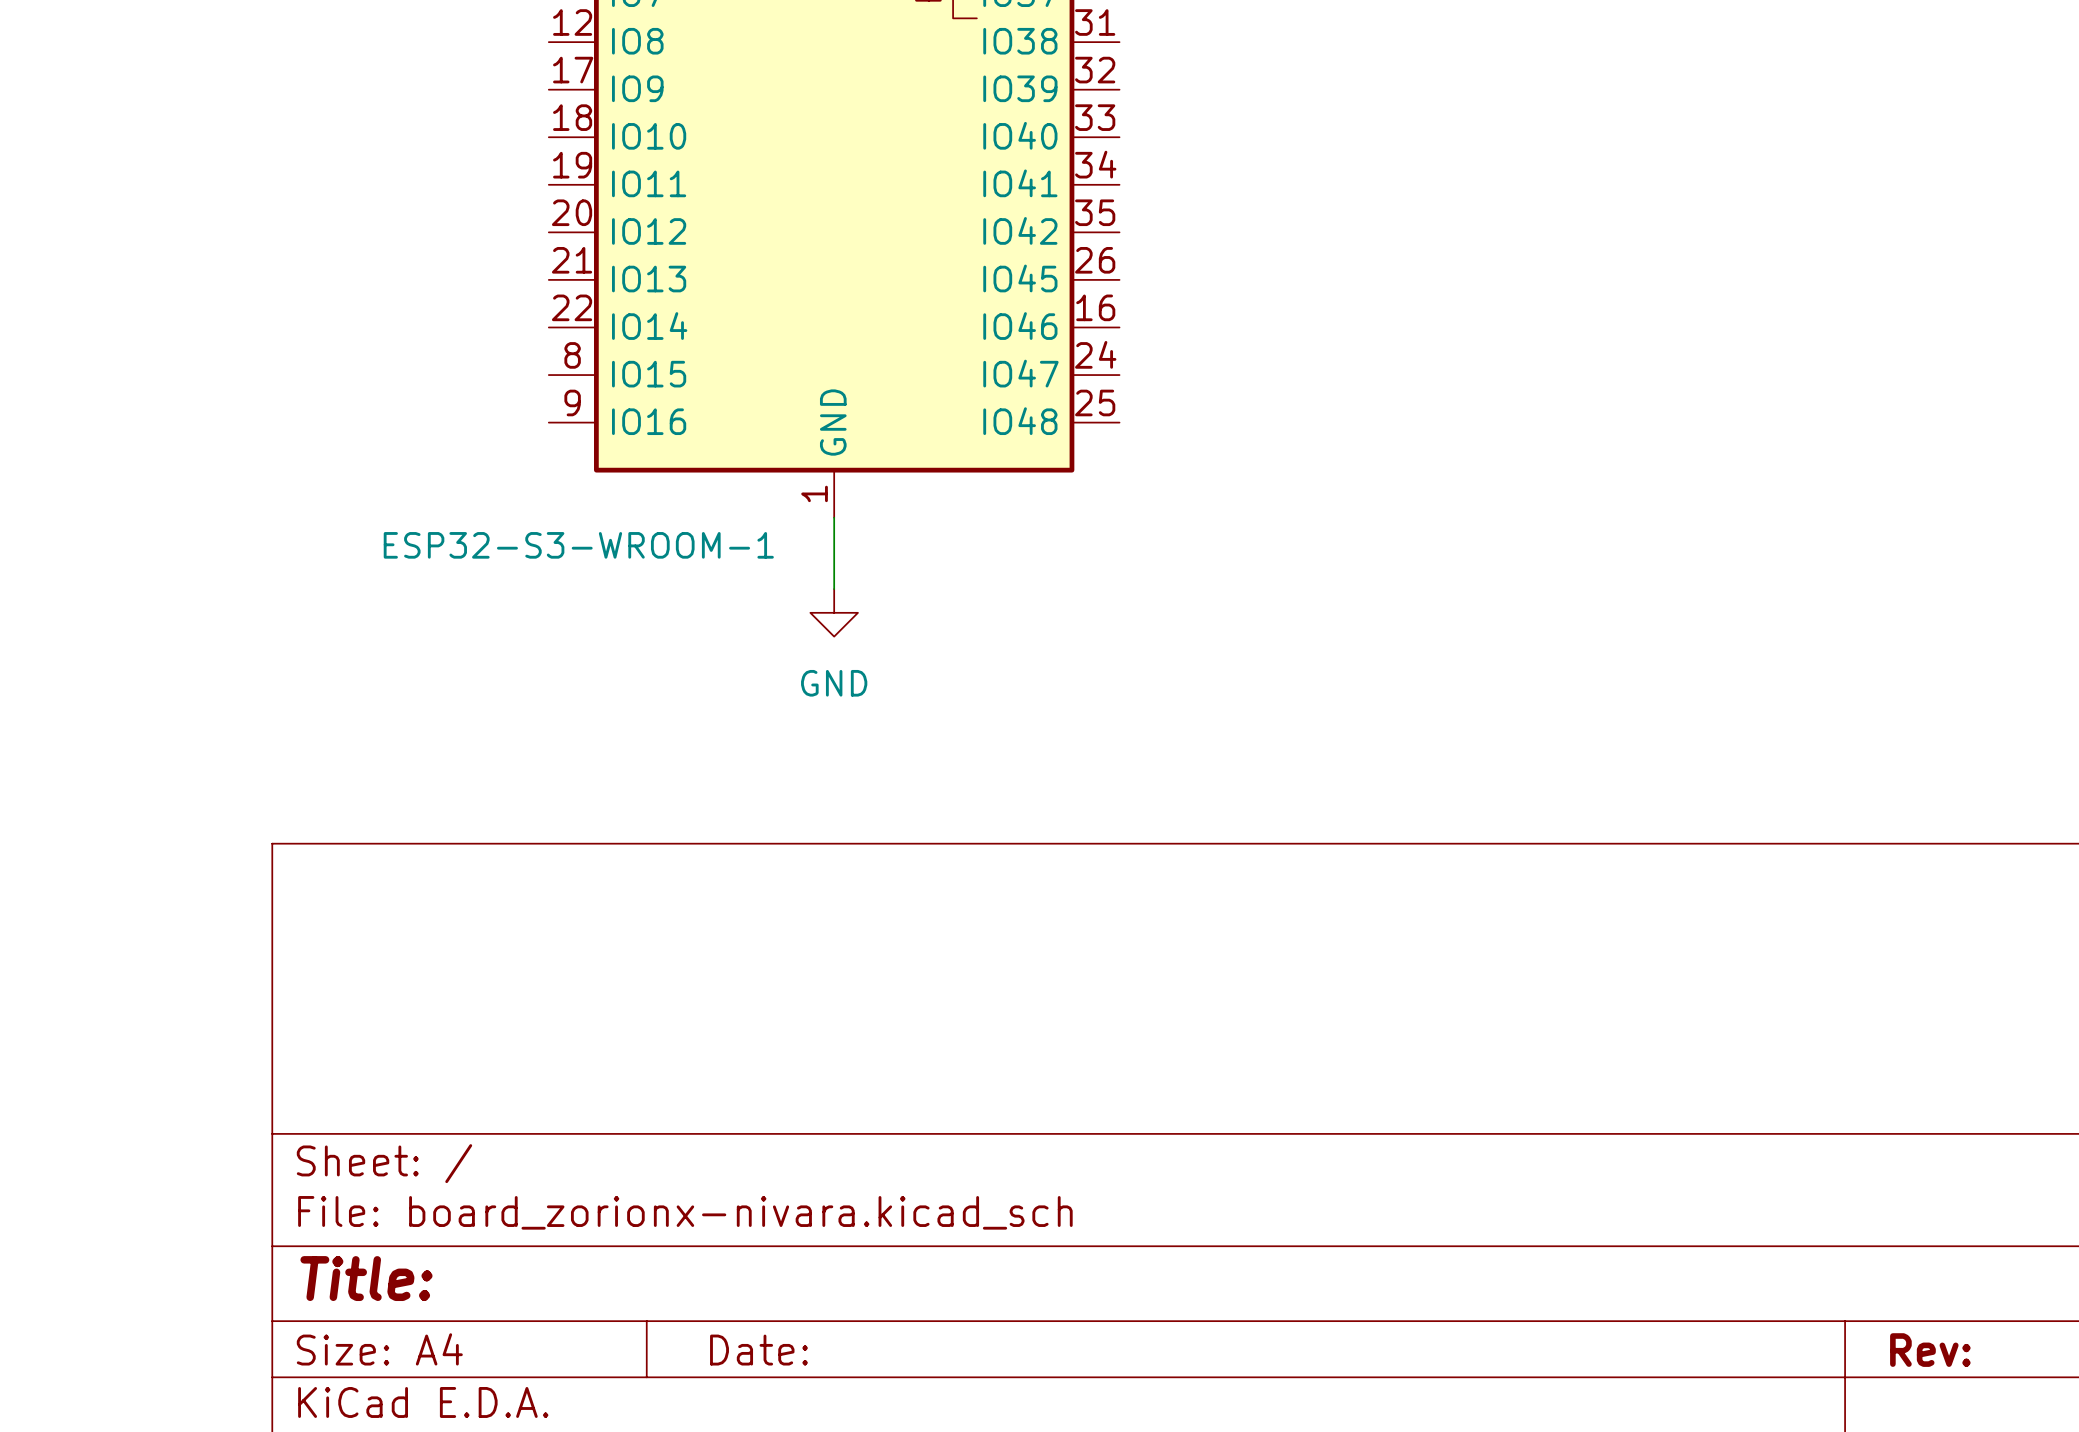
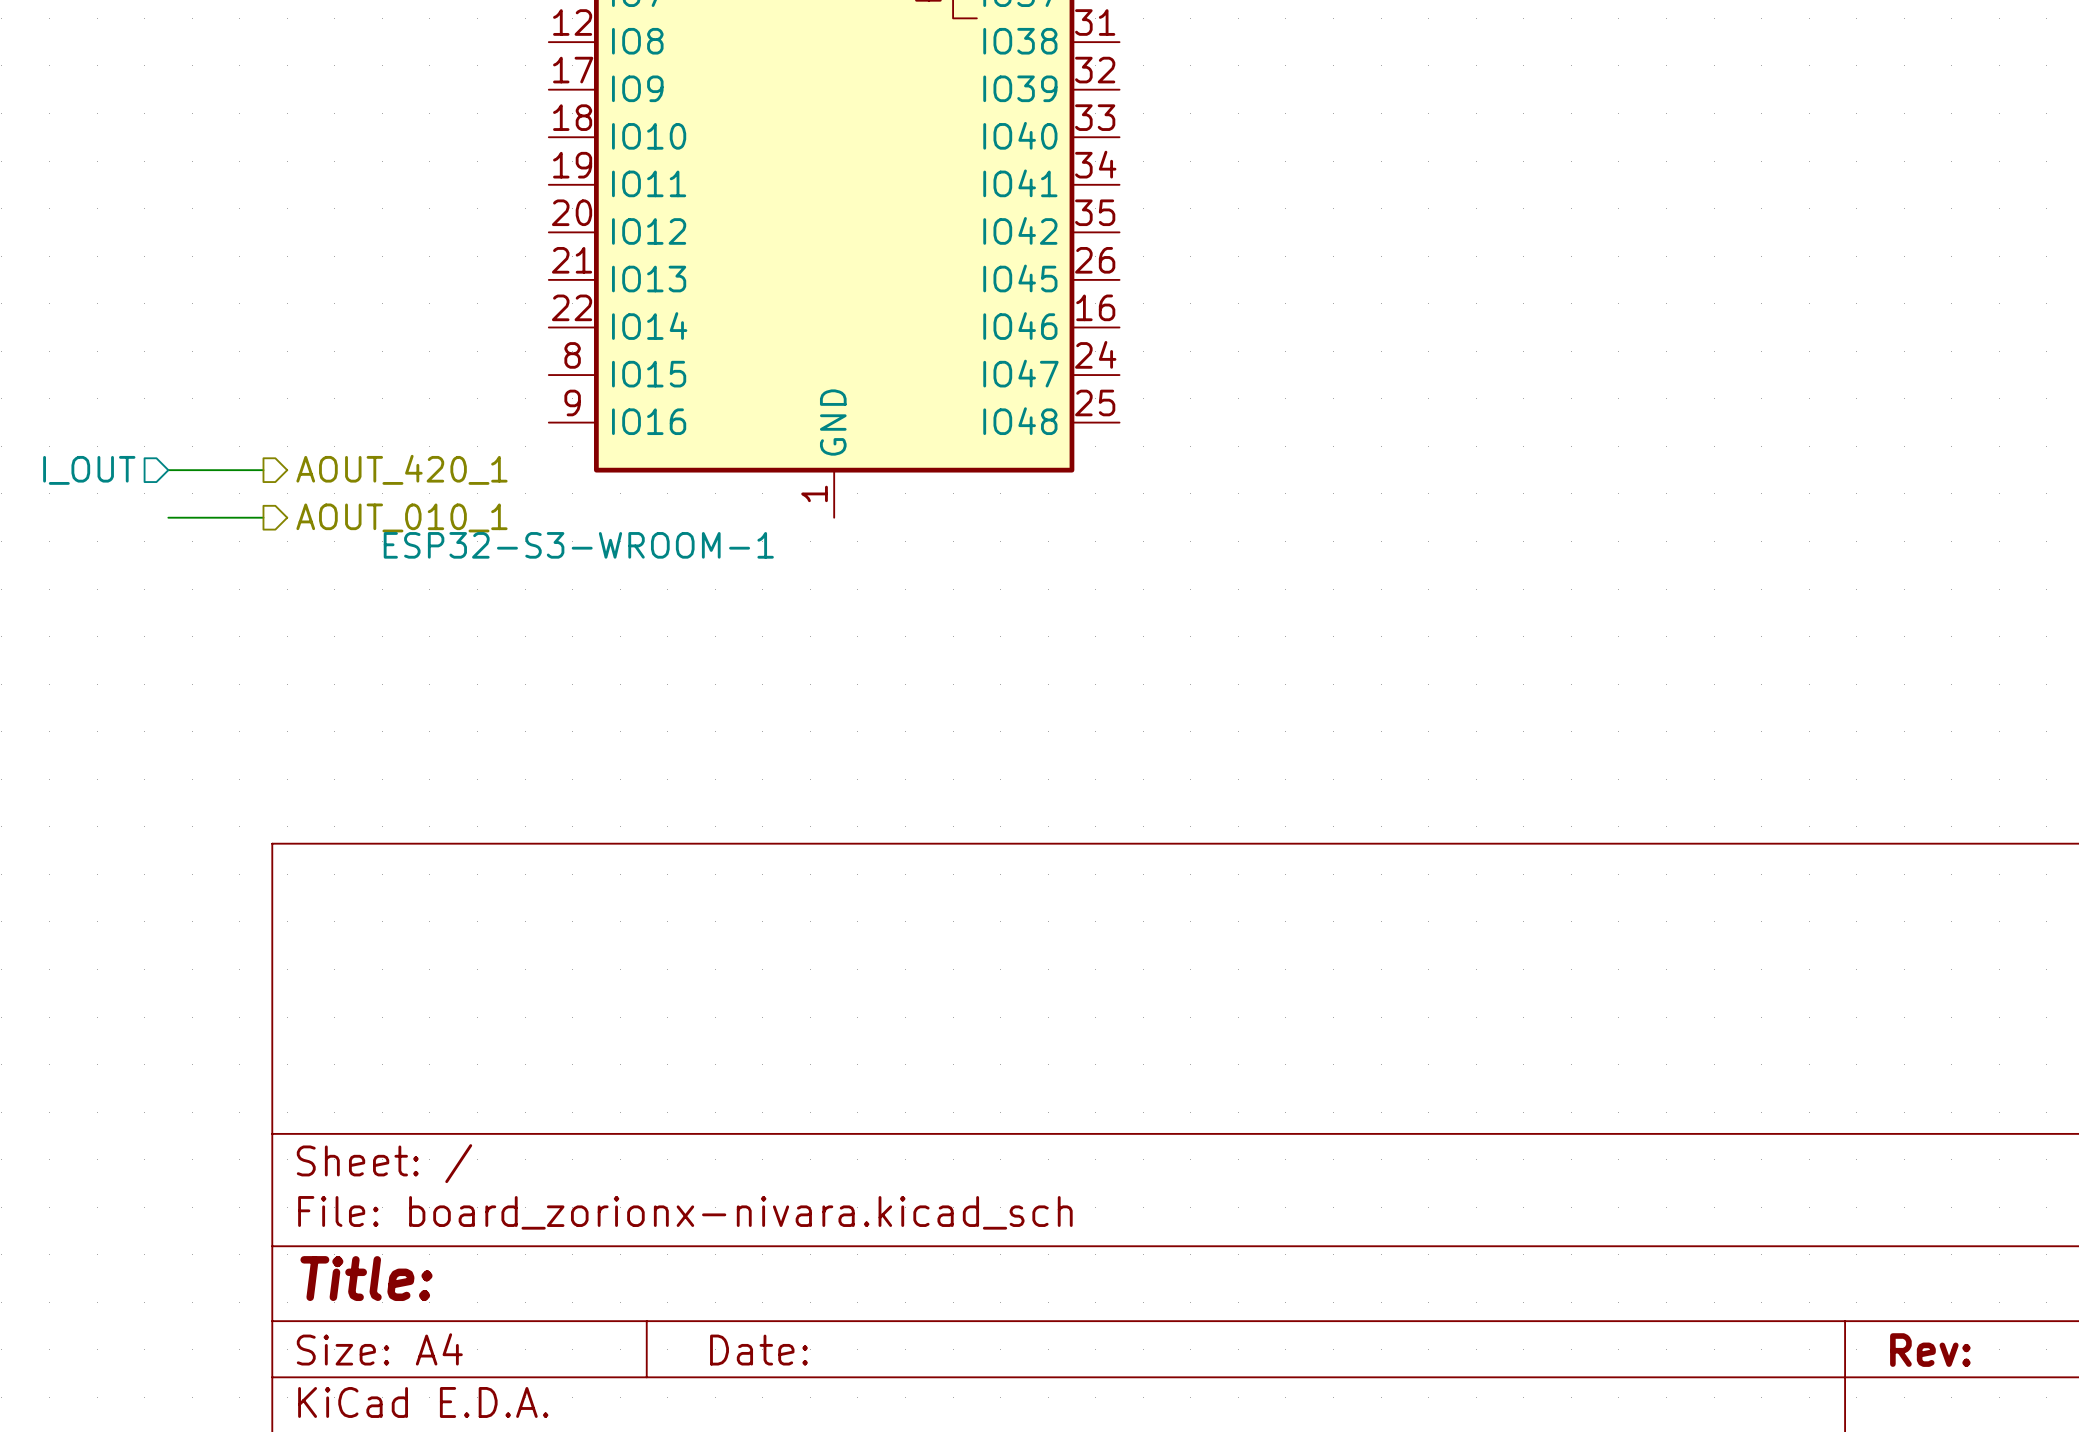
hierarchical label: none -> AOUT_420_1 (401, 469)
sheet pin: none -> I_OUT (89, 470)
wire: none -> (168, 470) (263, 470)
wire: none -> (168, 517) (263, 517)
hierarchical label: none -> AOUT_010_1 (401, 517)
wire: (834, 517) (834, 589) -> none
power symbol: GND (834, 612) -> none

